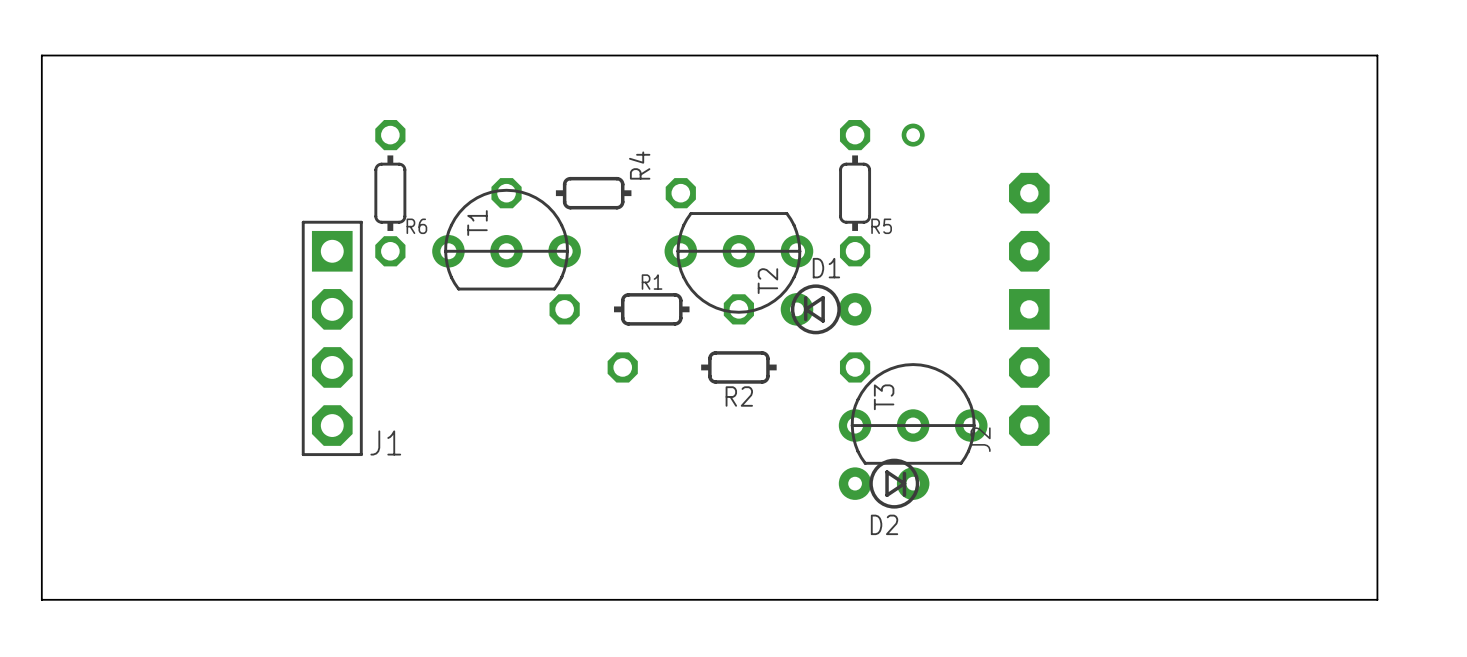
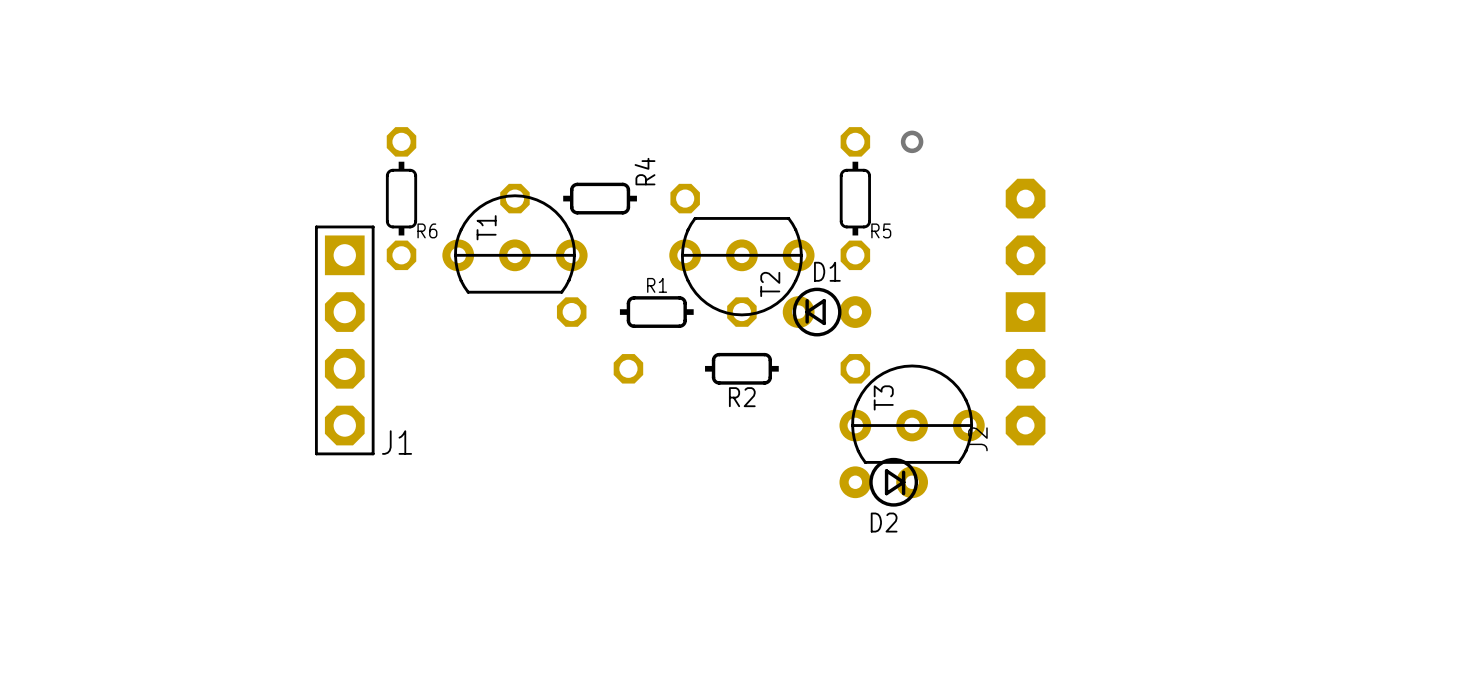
board edge: (41, 55) (1377, 55) (1377, 599) (41, 599) (41, 55) -> none

